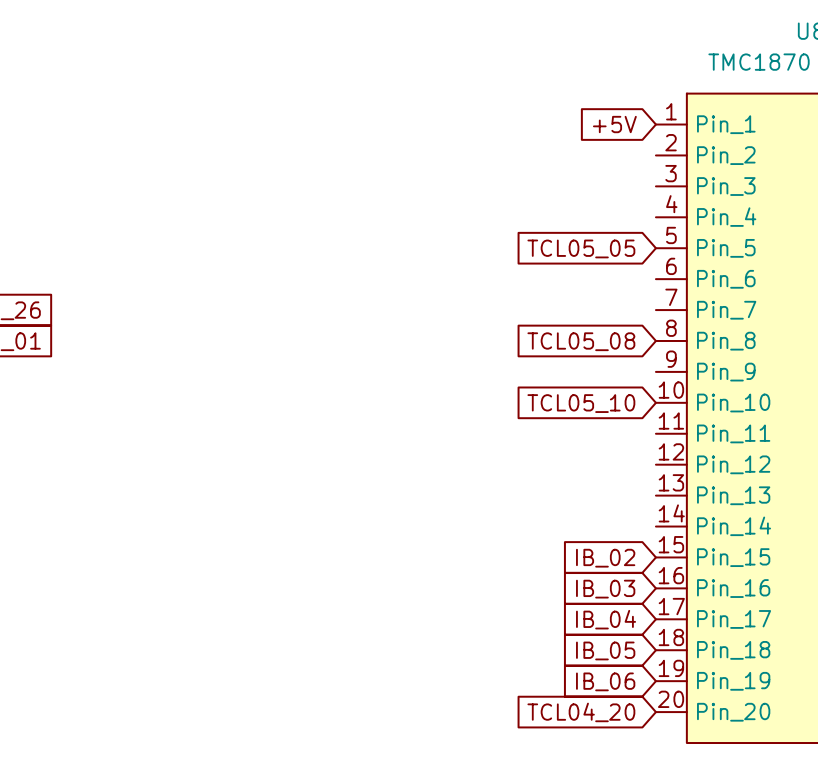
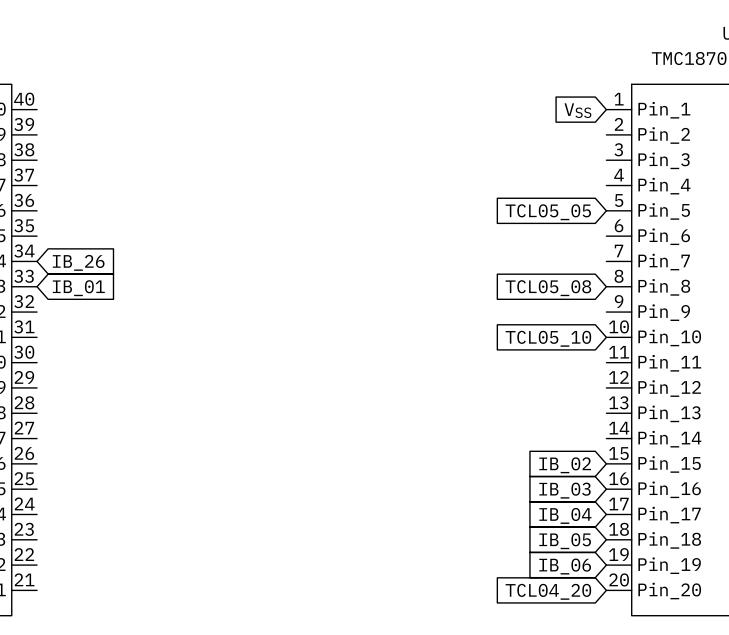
global label: +5V (614, 124) -> VSS (577, 110)

